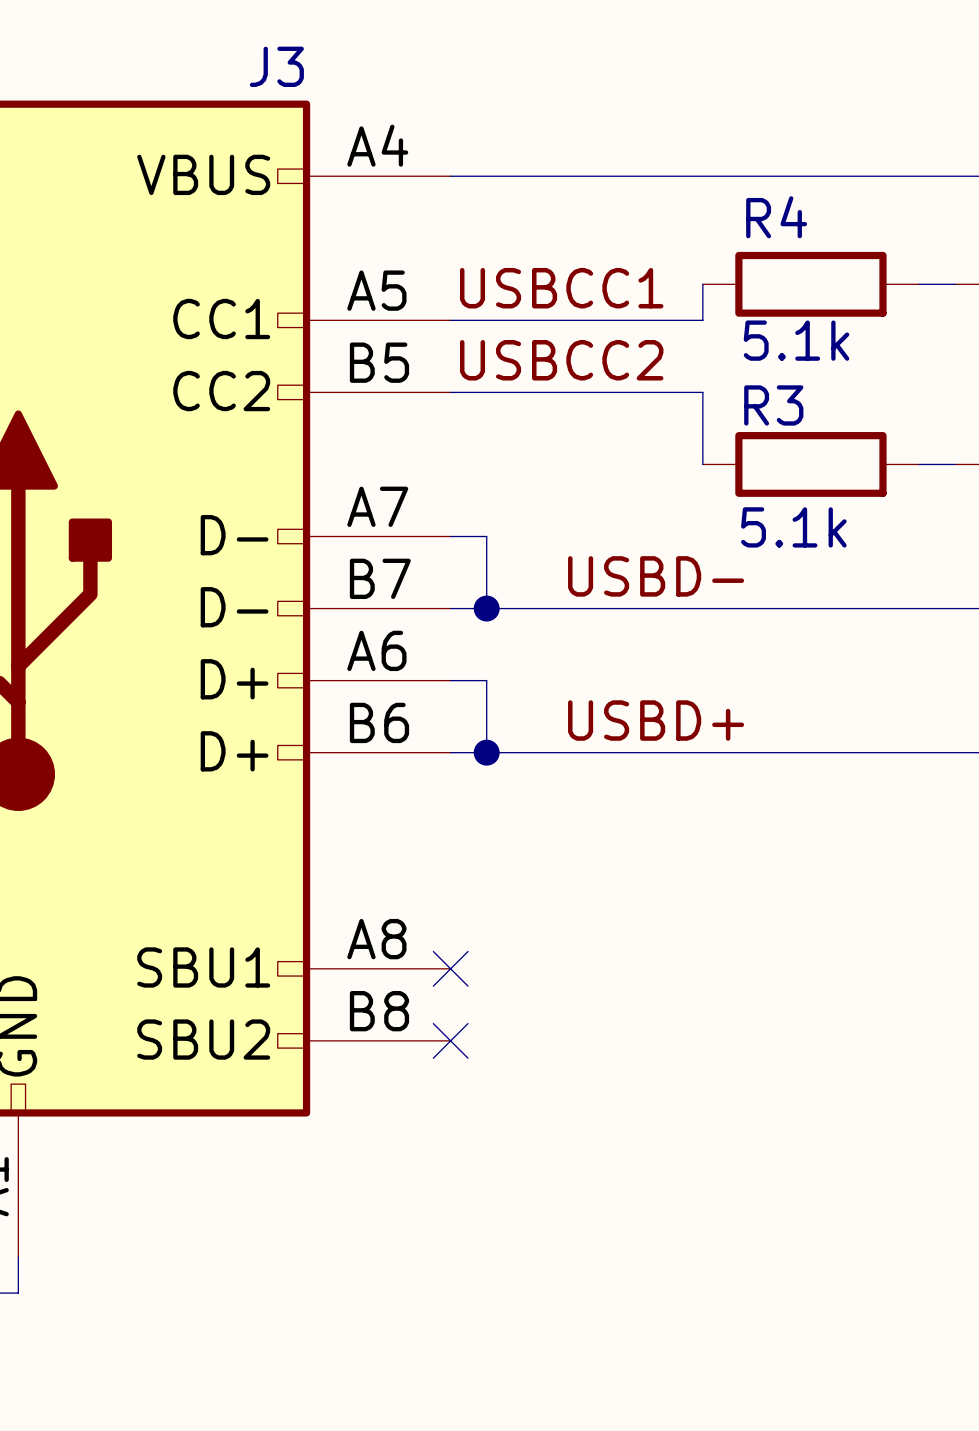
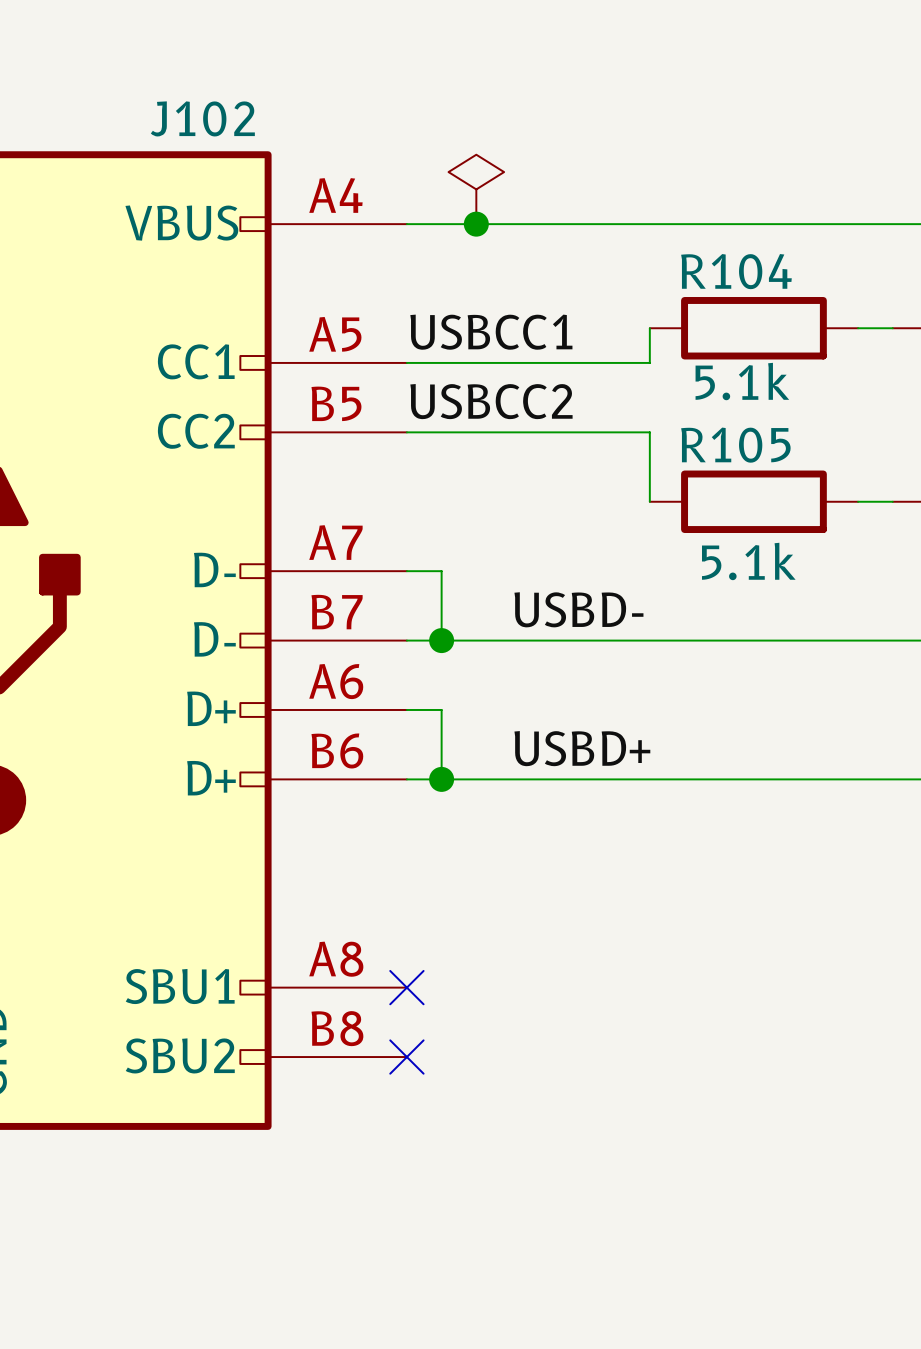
J3 name: J3 (276, 66) -> J102 (202, 118)
power symbol: none -> (476, 189)
junction: none -> (476, 224)
R4 name: R4 (776, 217) -> R104 (736, 271)
R3 name: R3 (773, 405) -> R105 (735, 445)

